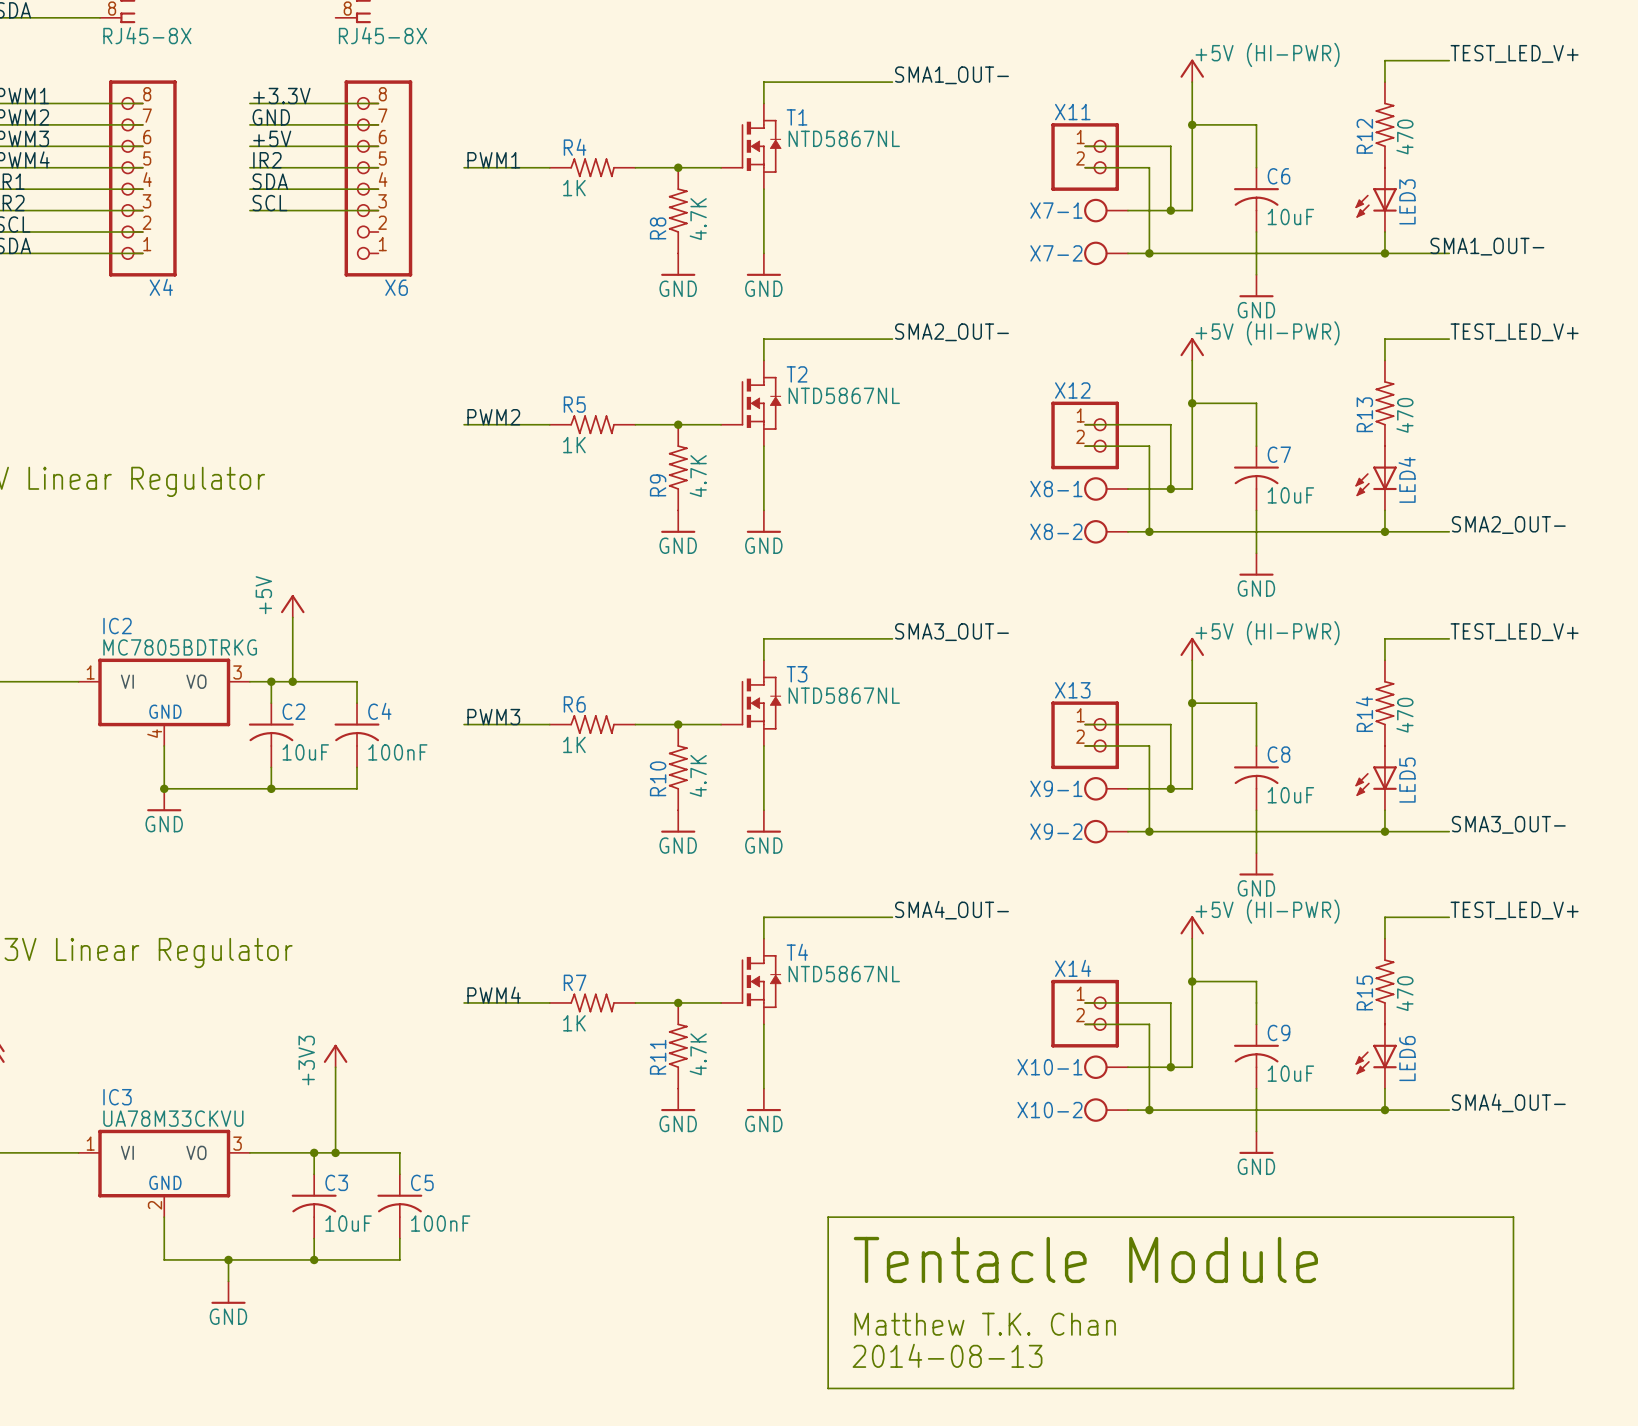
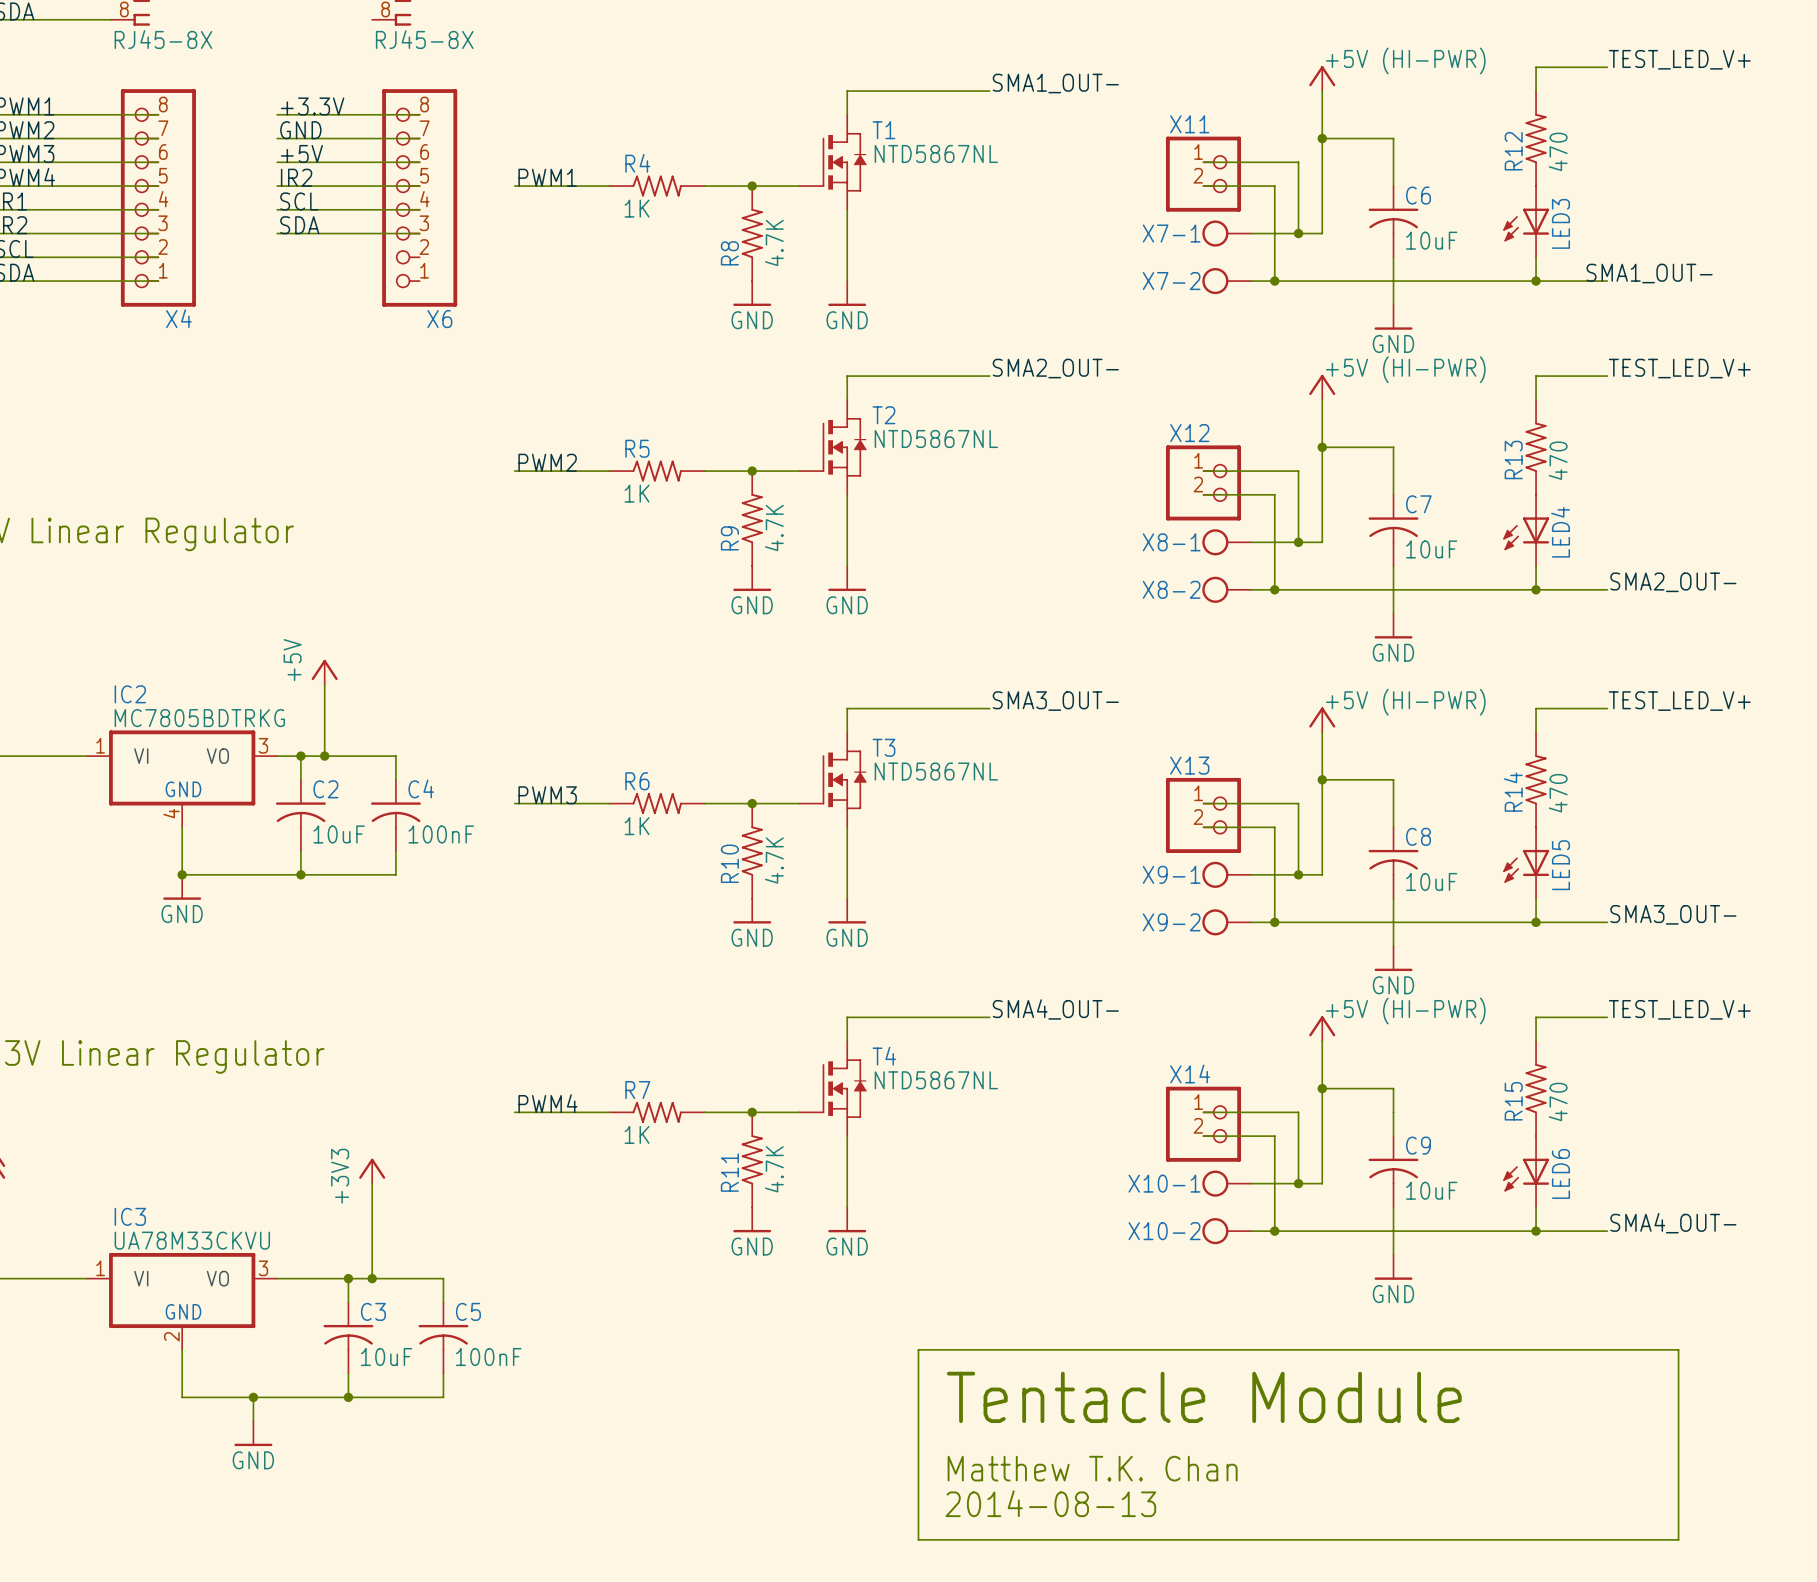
label: SDA (270, 181) -> SCL (299, 201)
label: SCL (269, 203) -> SDA (299, 225)

